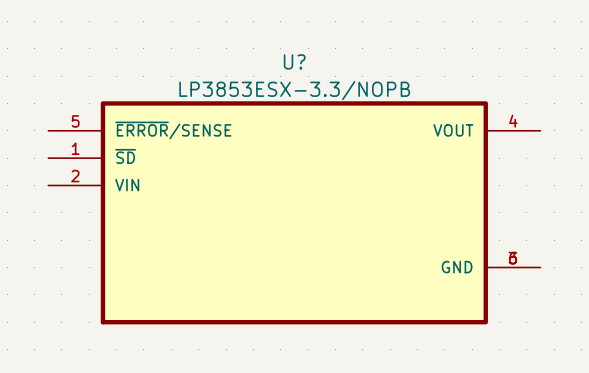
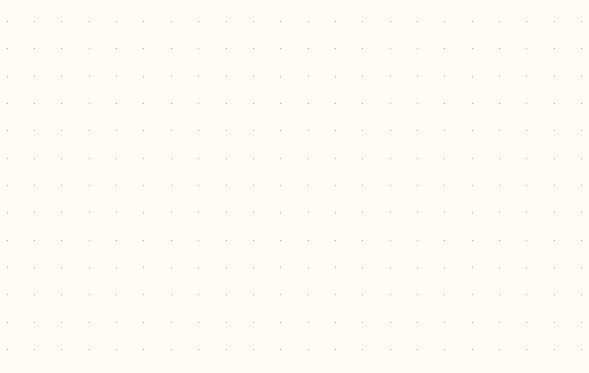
U?: LP3853ESX-3.3/NOPB (294, 212) -> none

